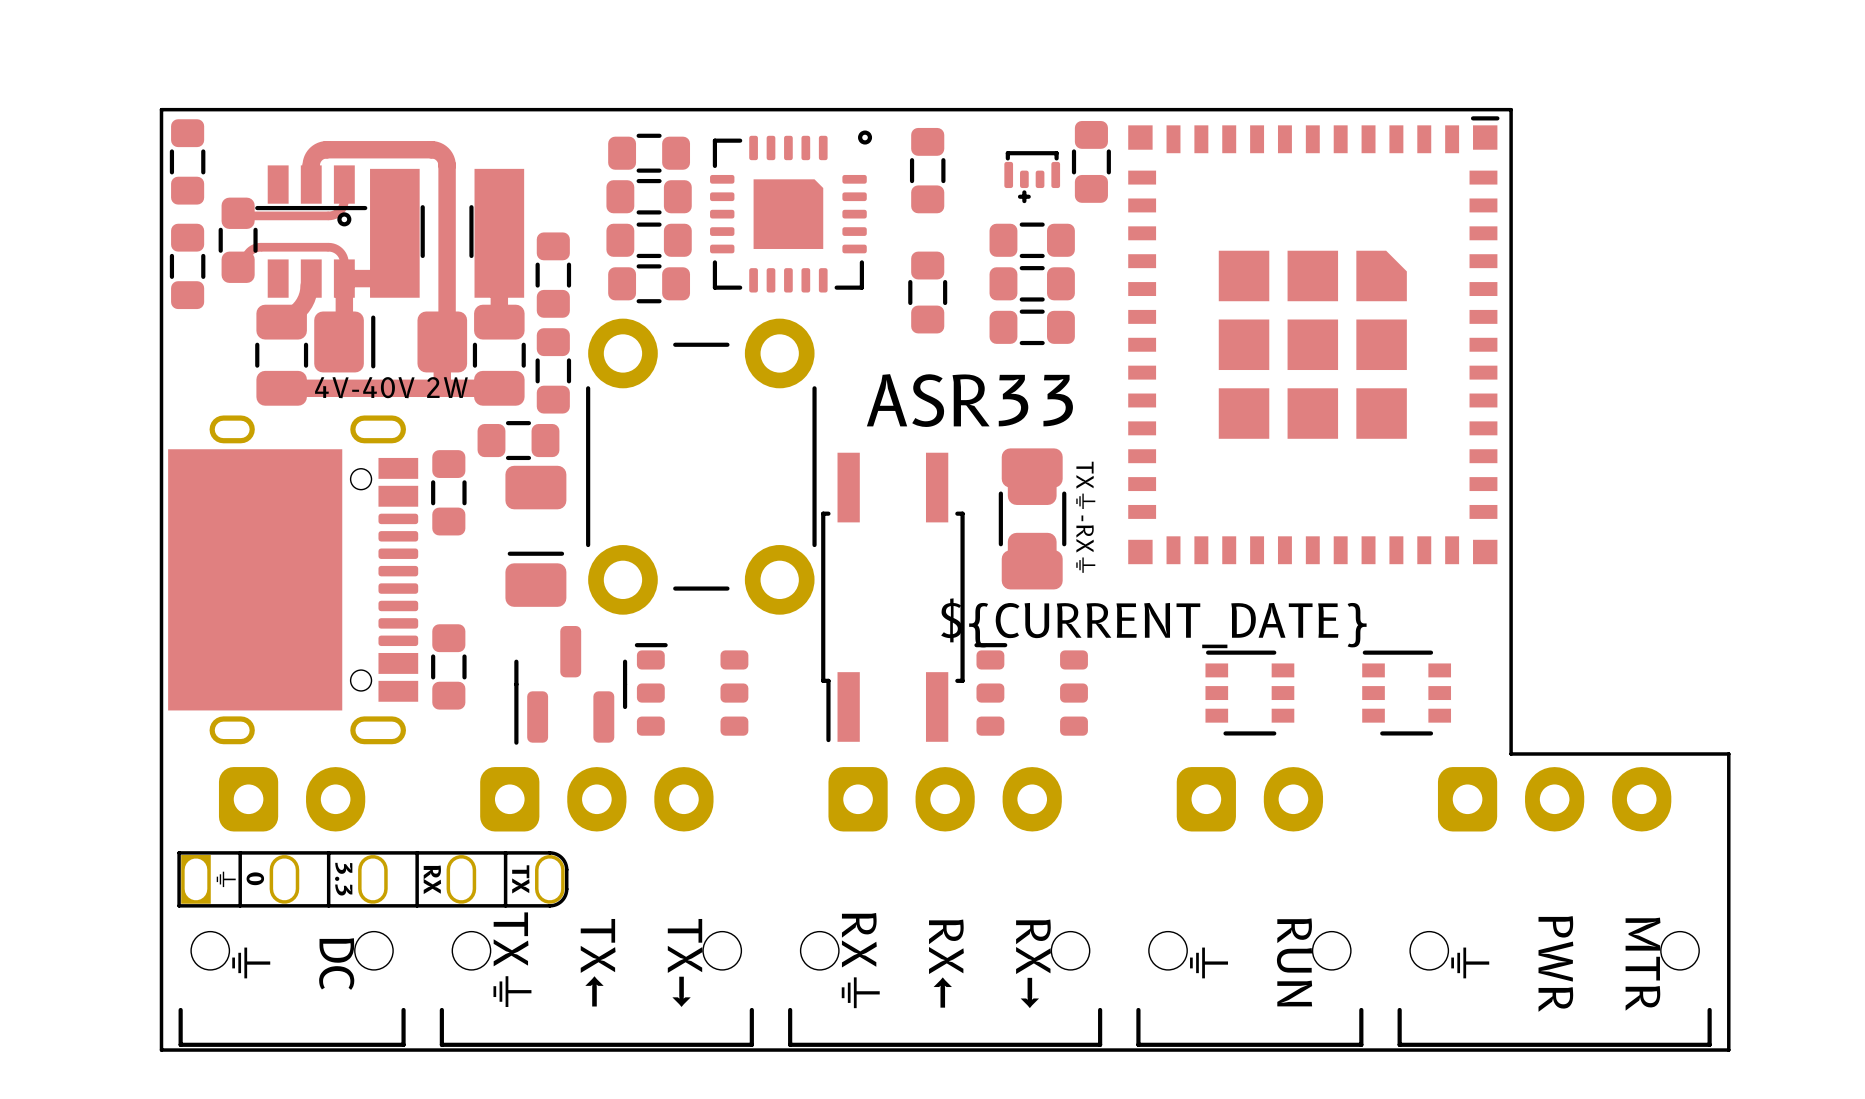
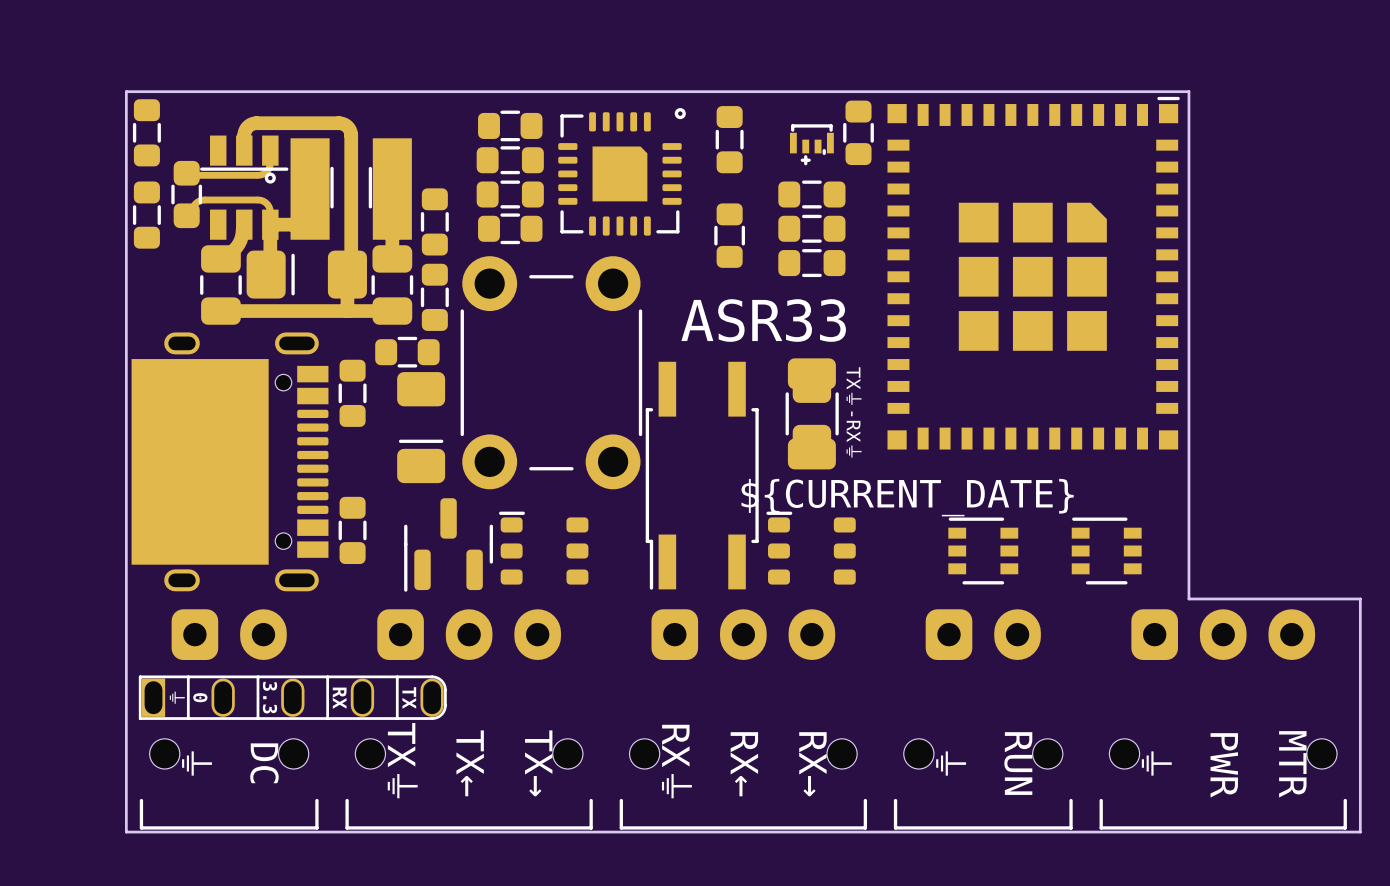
part footprint: [1004, 151, 1061, 204] -> [789, 124, 834, 166]
part text: 4V-40V 2W (391, 387) -> none

